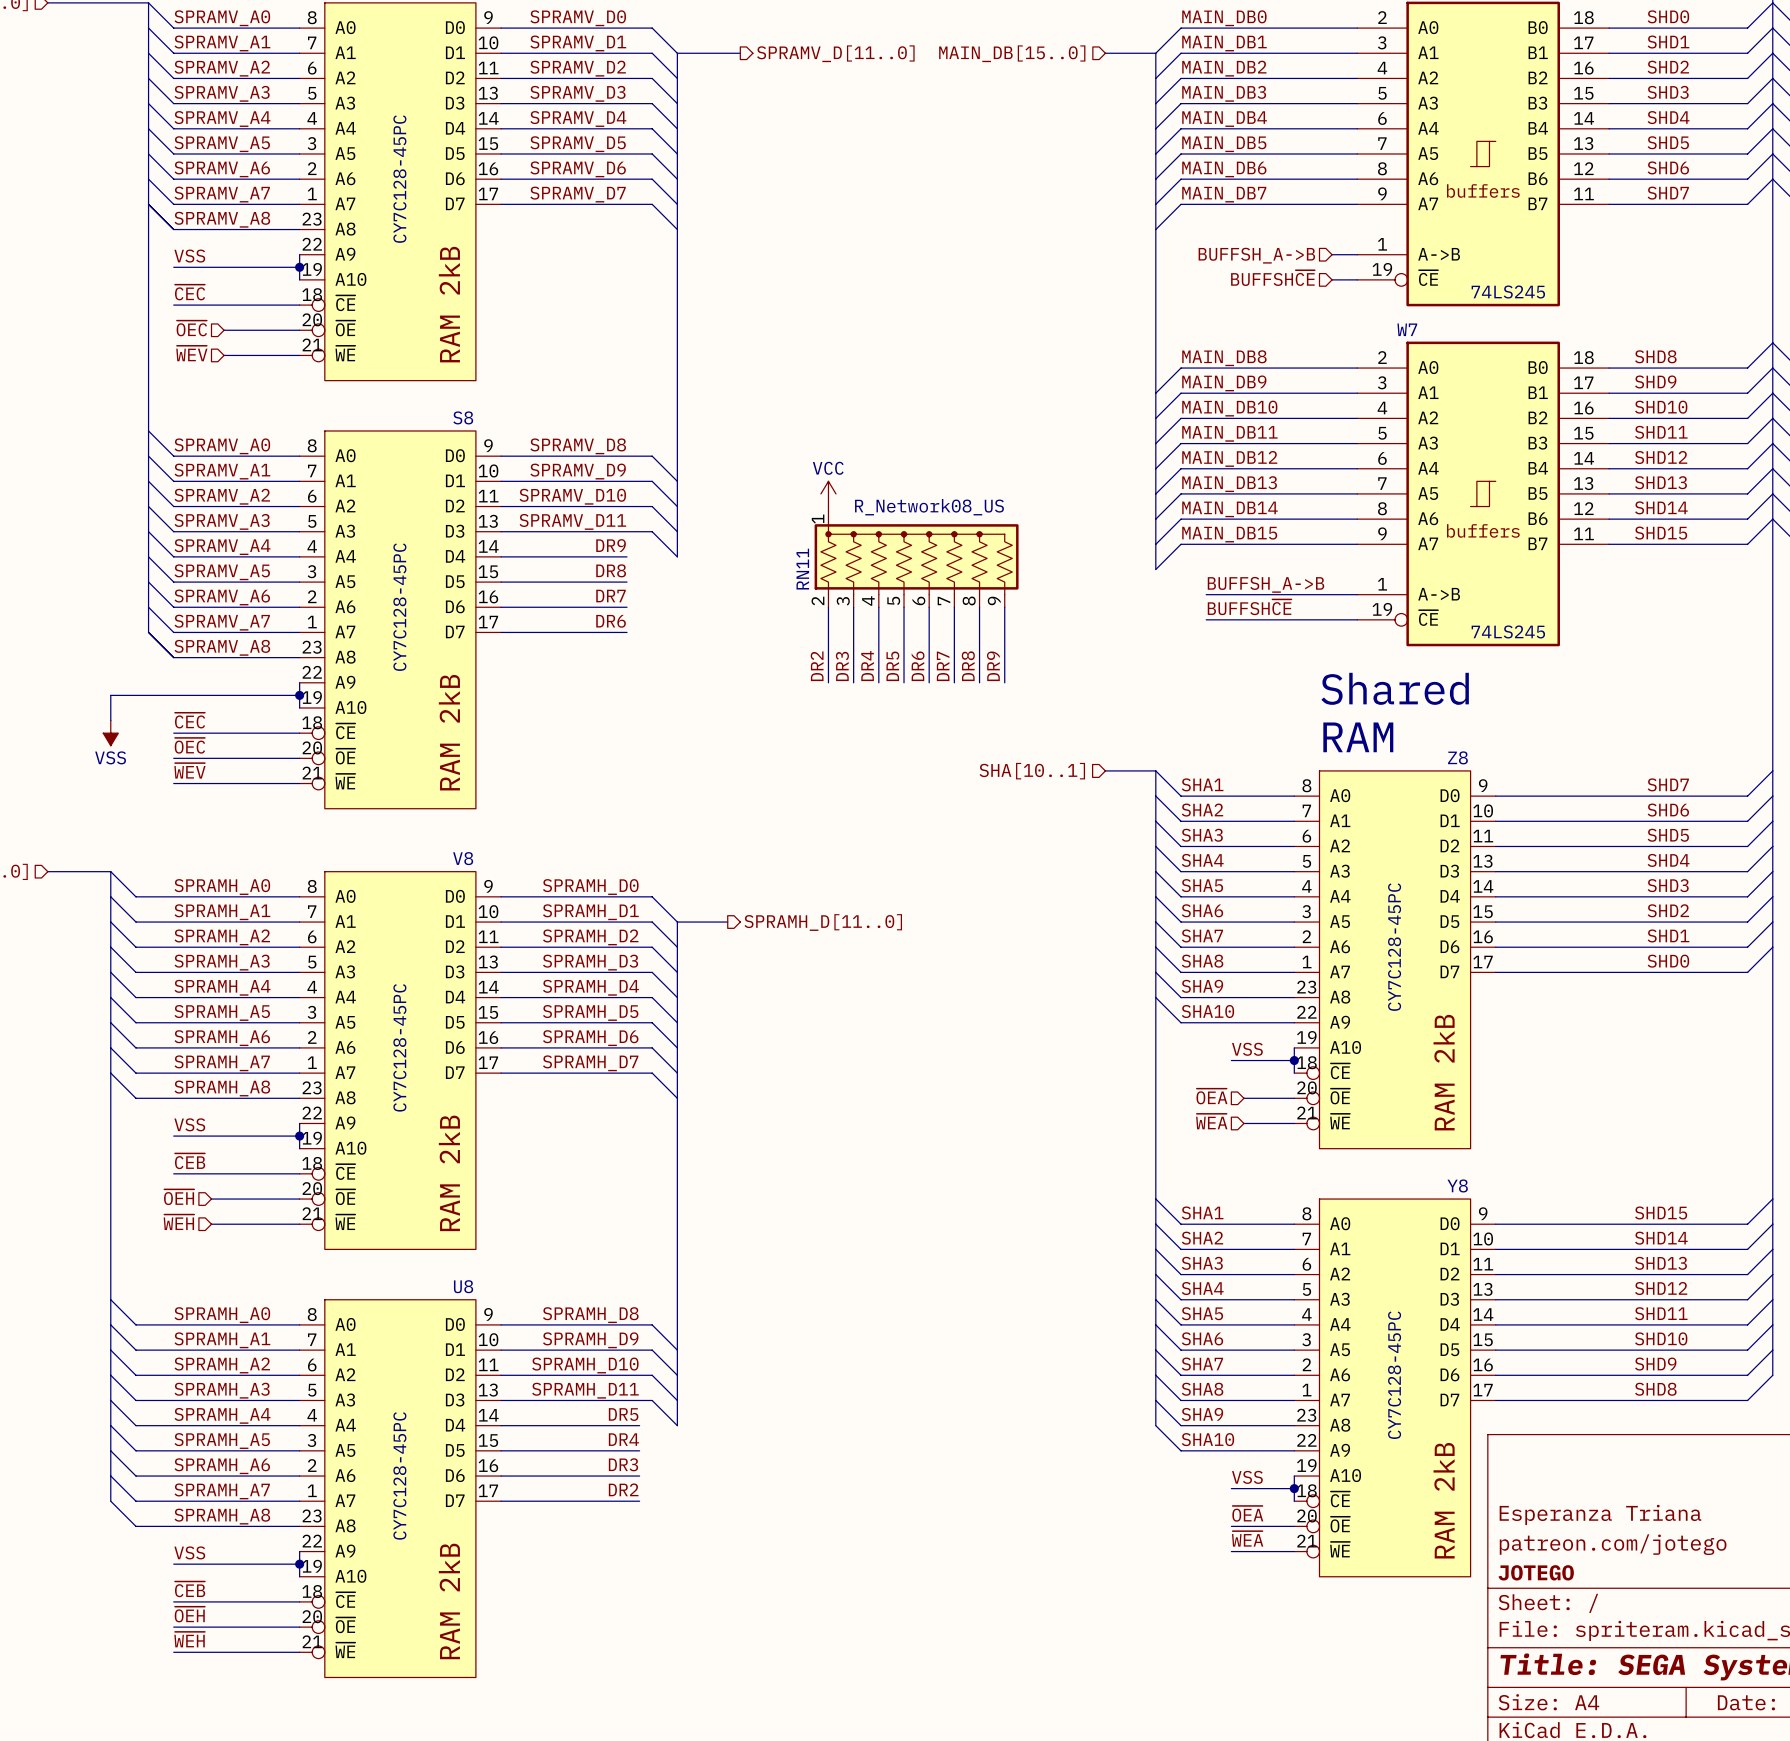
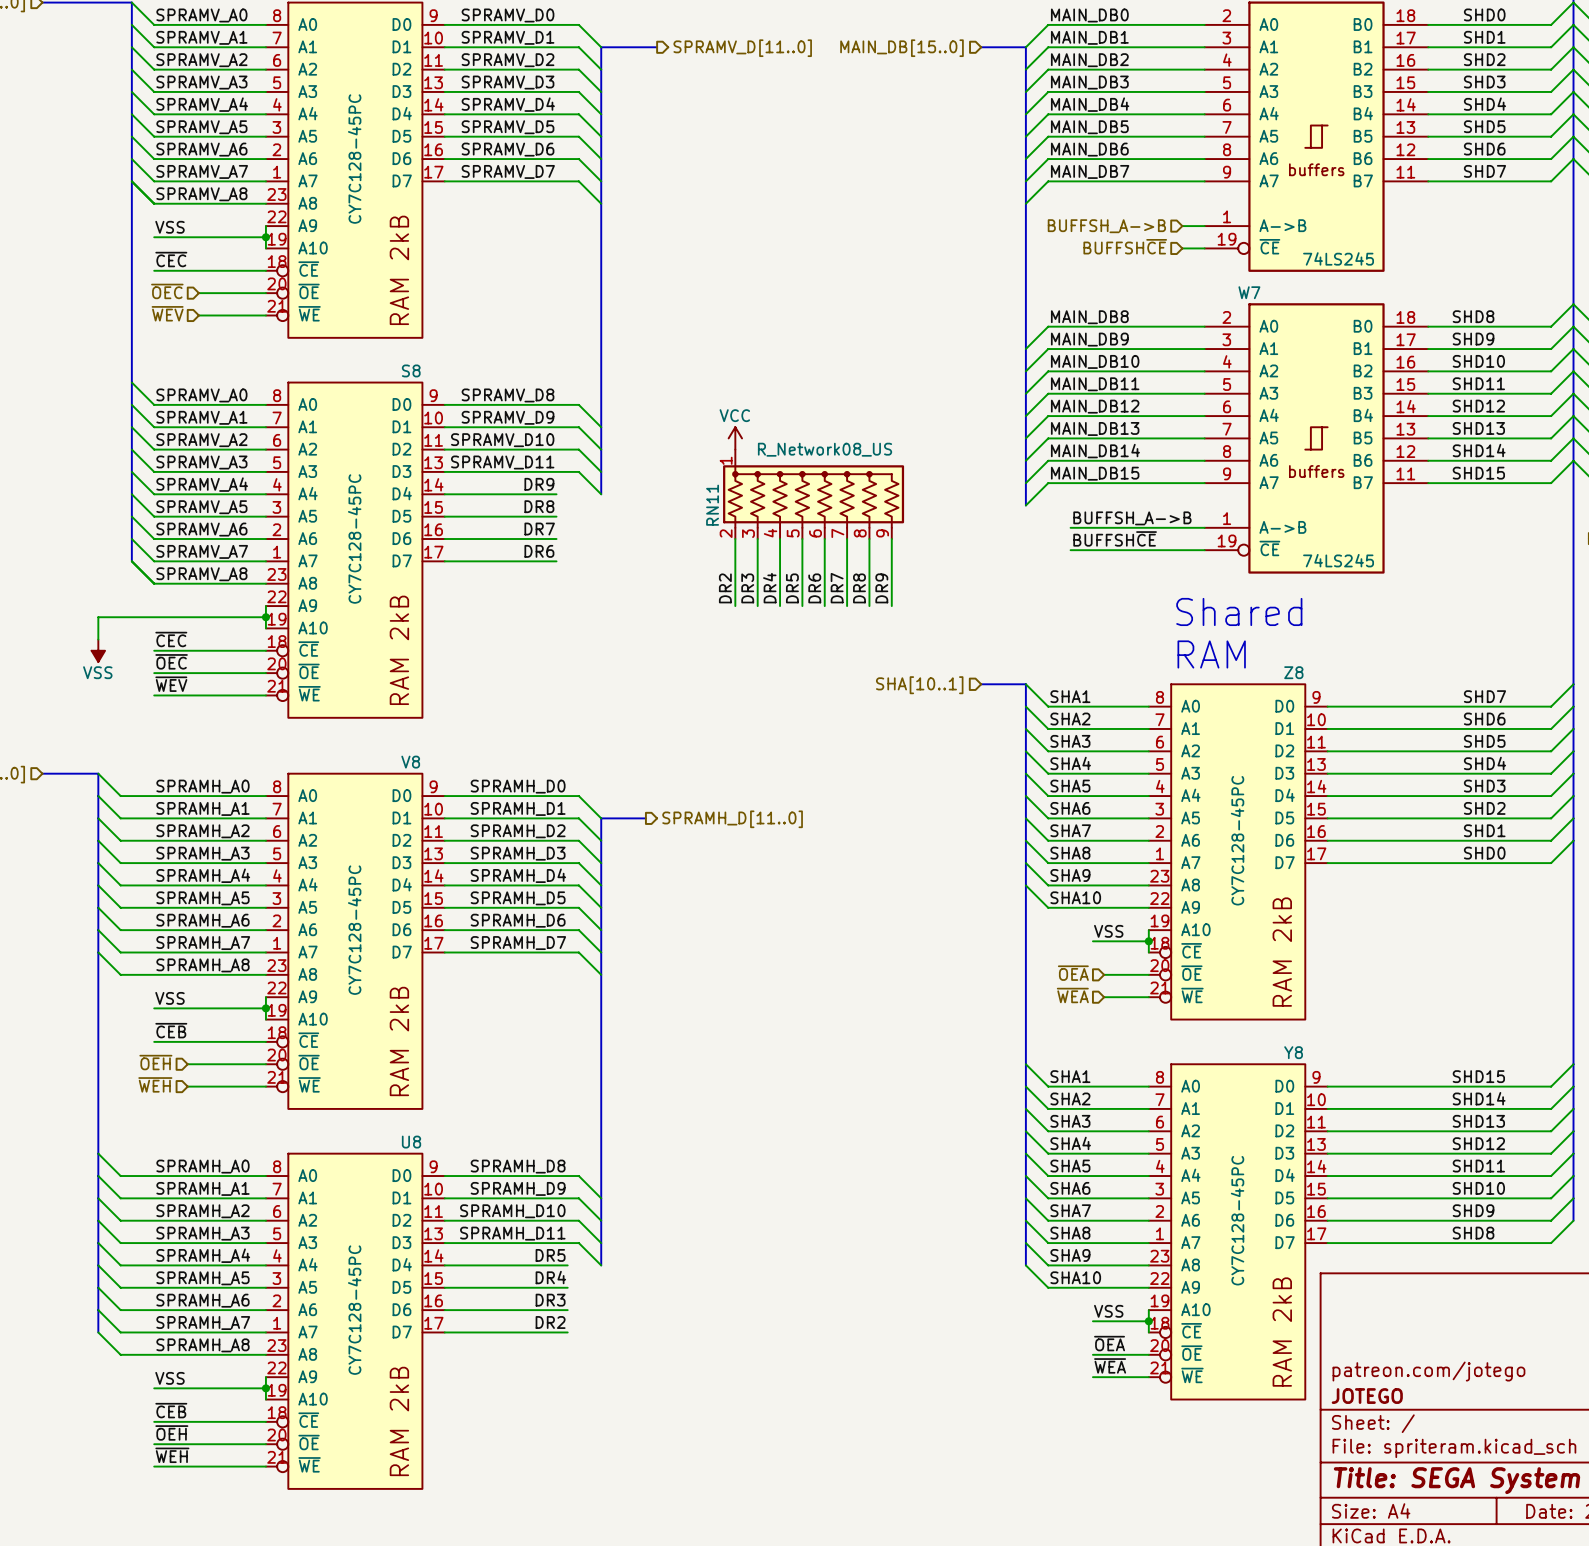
title block: Esperanza Triana (1600, 1514) -> none

